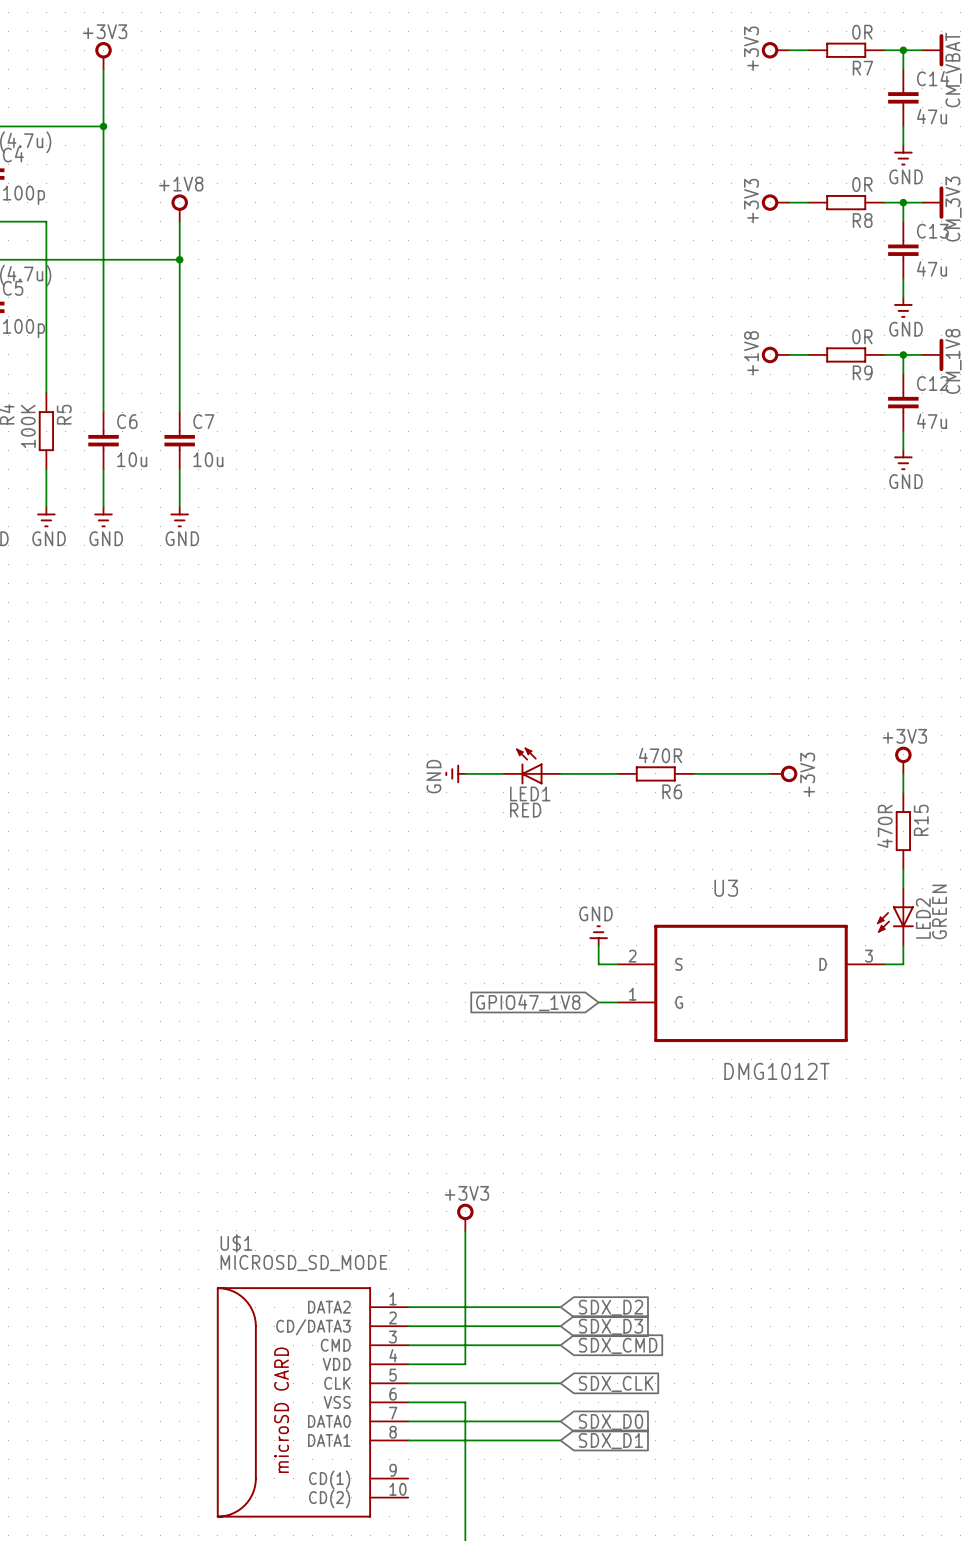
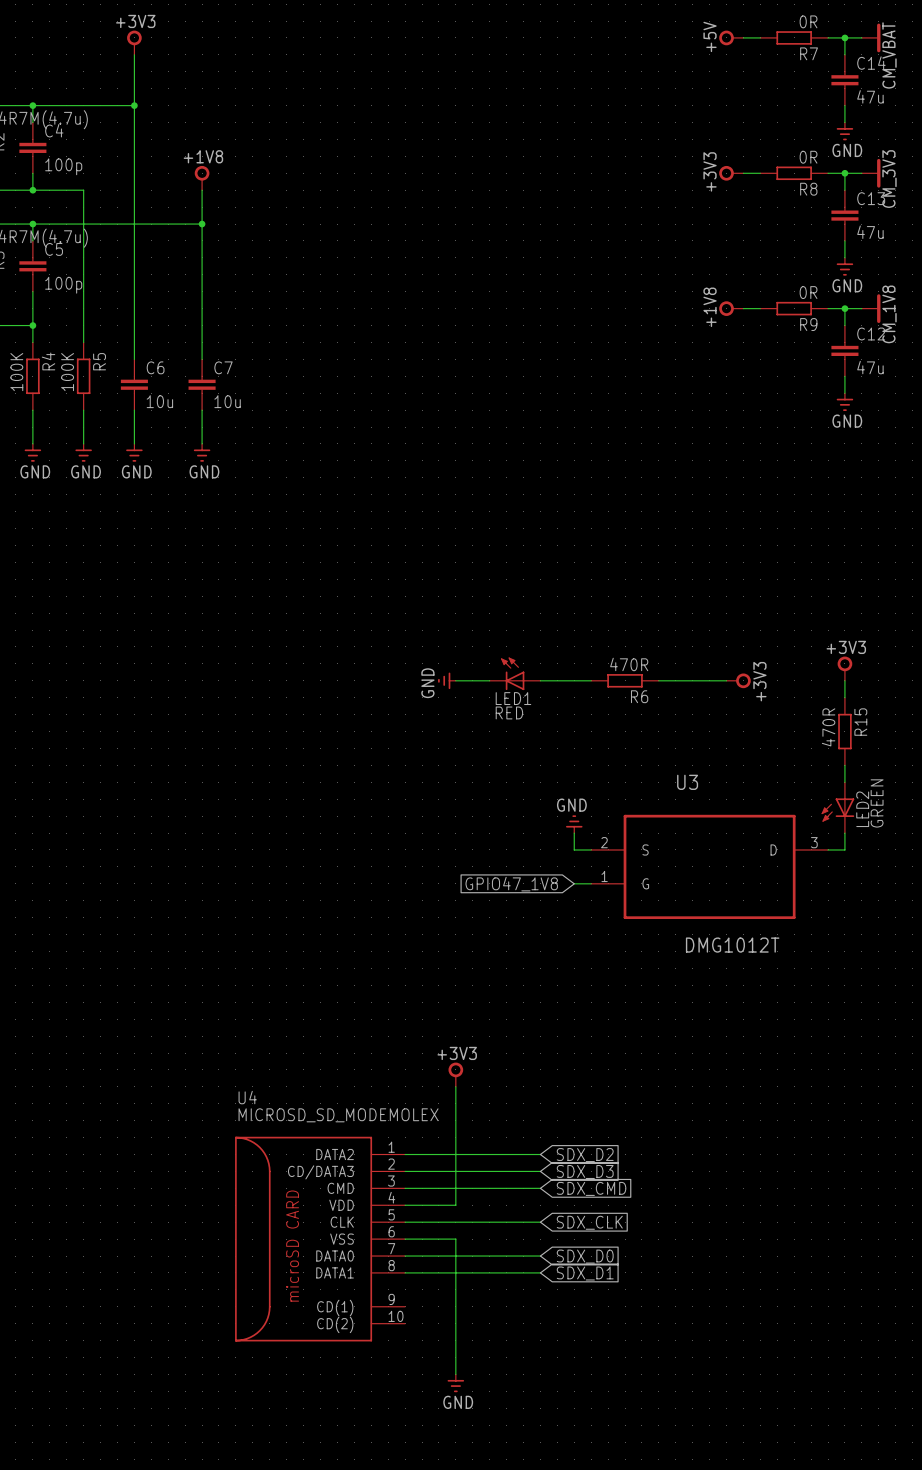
power symbol: +3V3 (775, 50) -> +5V (731, 37)
U$1 name: U$1 (236, 1243) -> U4 (247, 1097)
U$1 value: MICROSD_SD_MODE (303, 1263) -> MICROSD_SD_MODEMOLEX (338, 1115)

